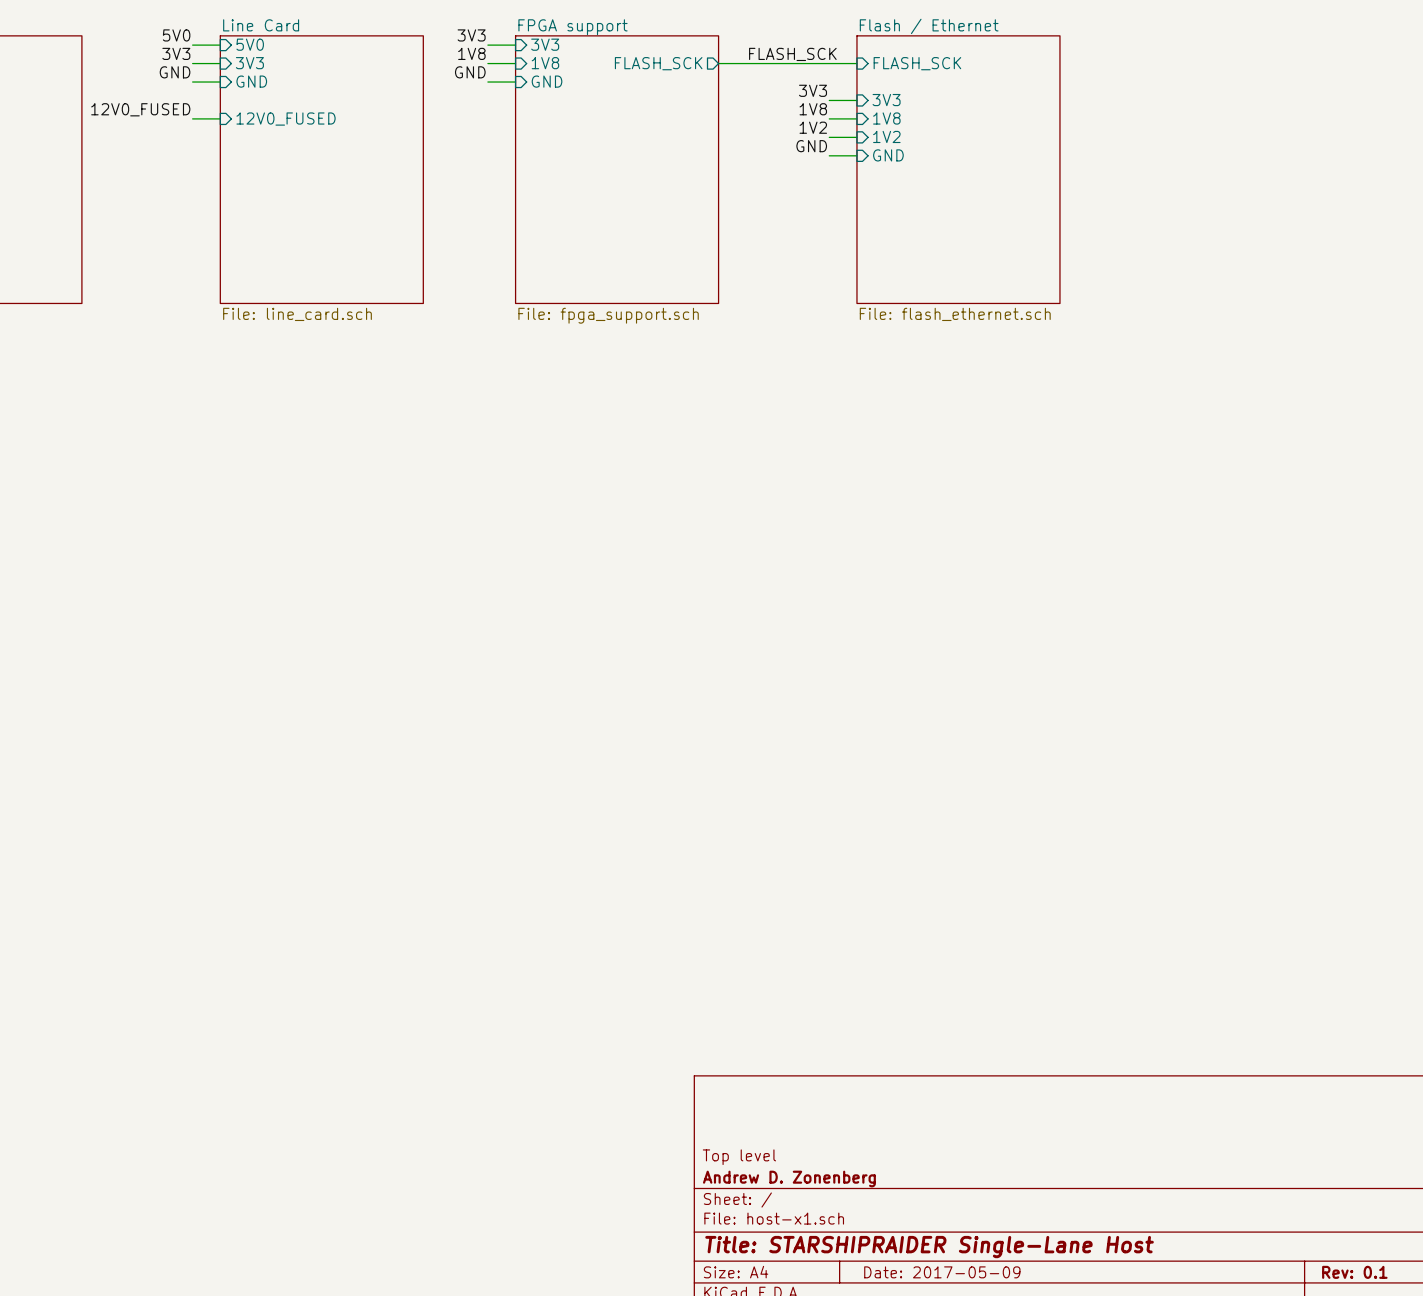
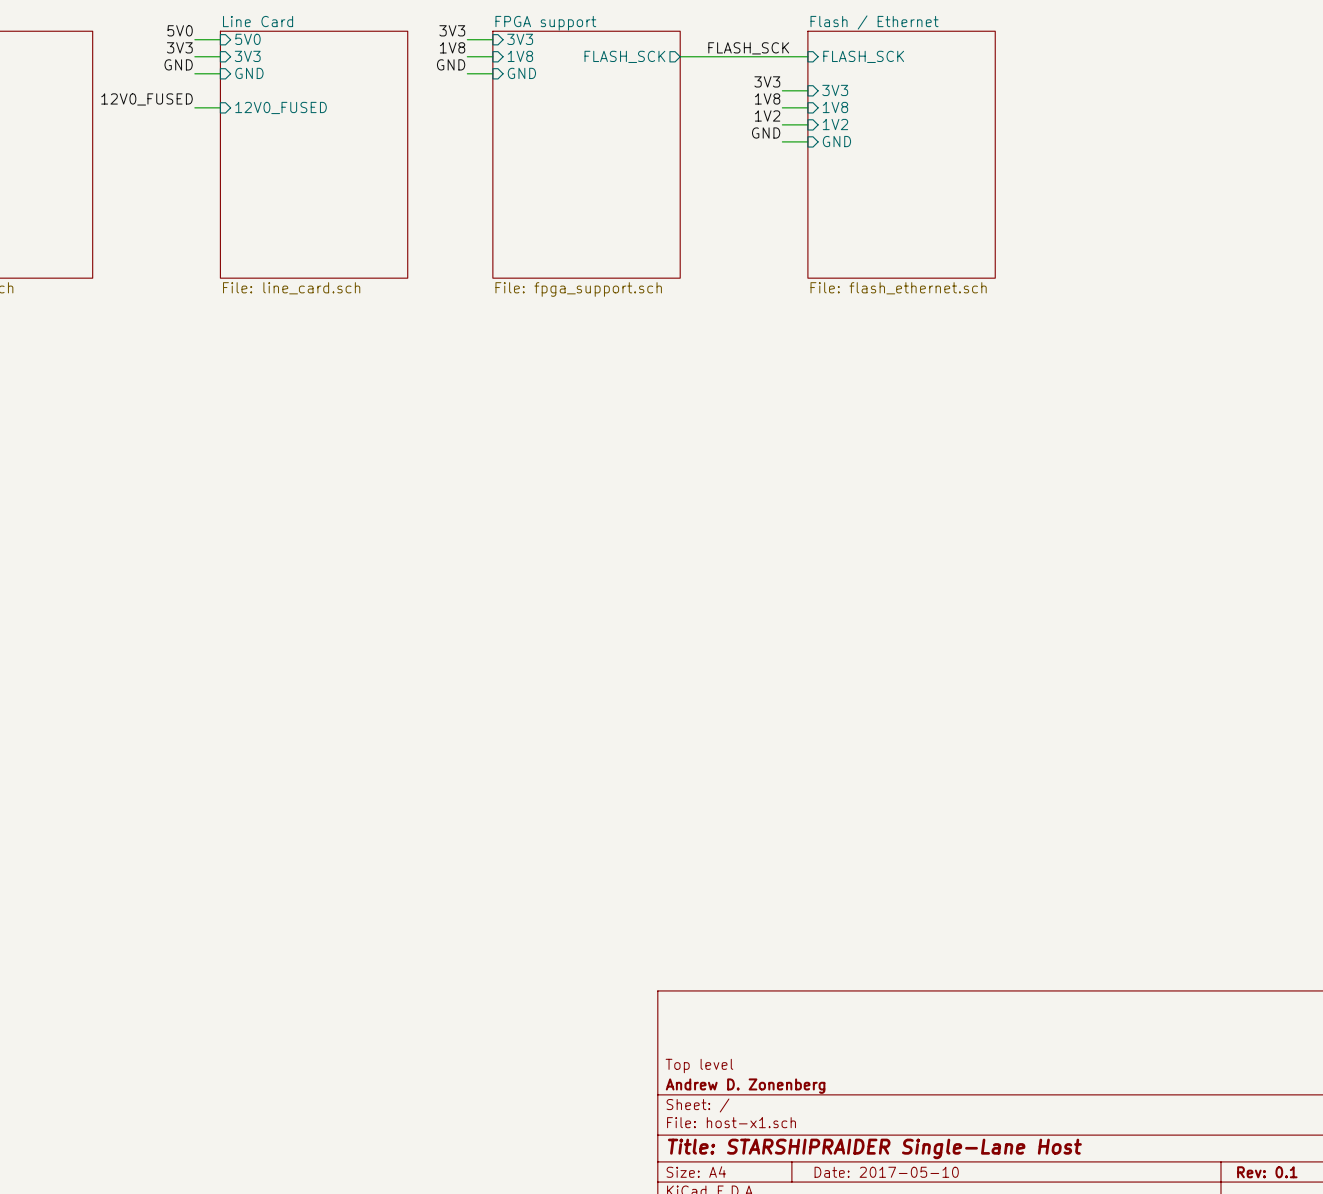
title block: Date: 2017-05-09 (942, 1272) -> Date: 2017-05-10 (886, 1172)

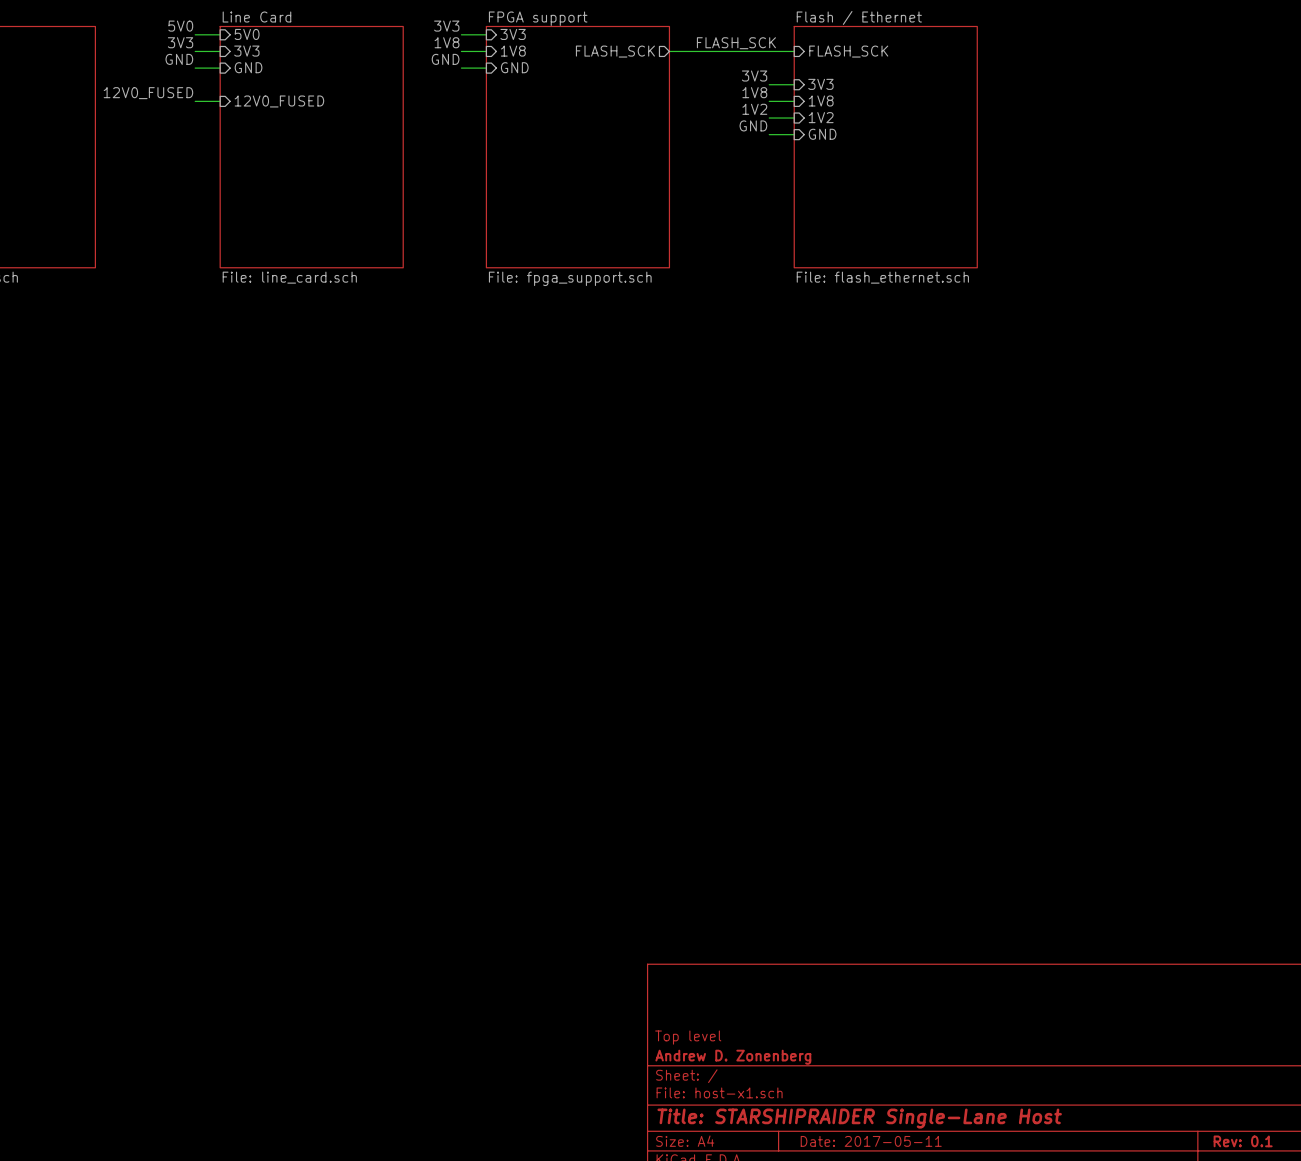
title block: Date: 2017-05-10 (886, 1172) -> Date: 2017-05-11 (871, 1141)

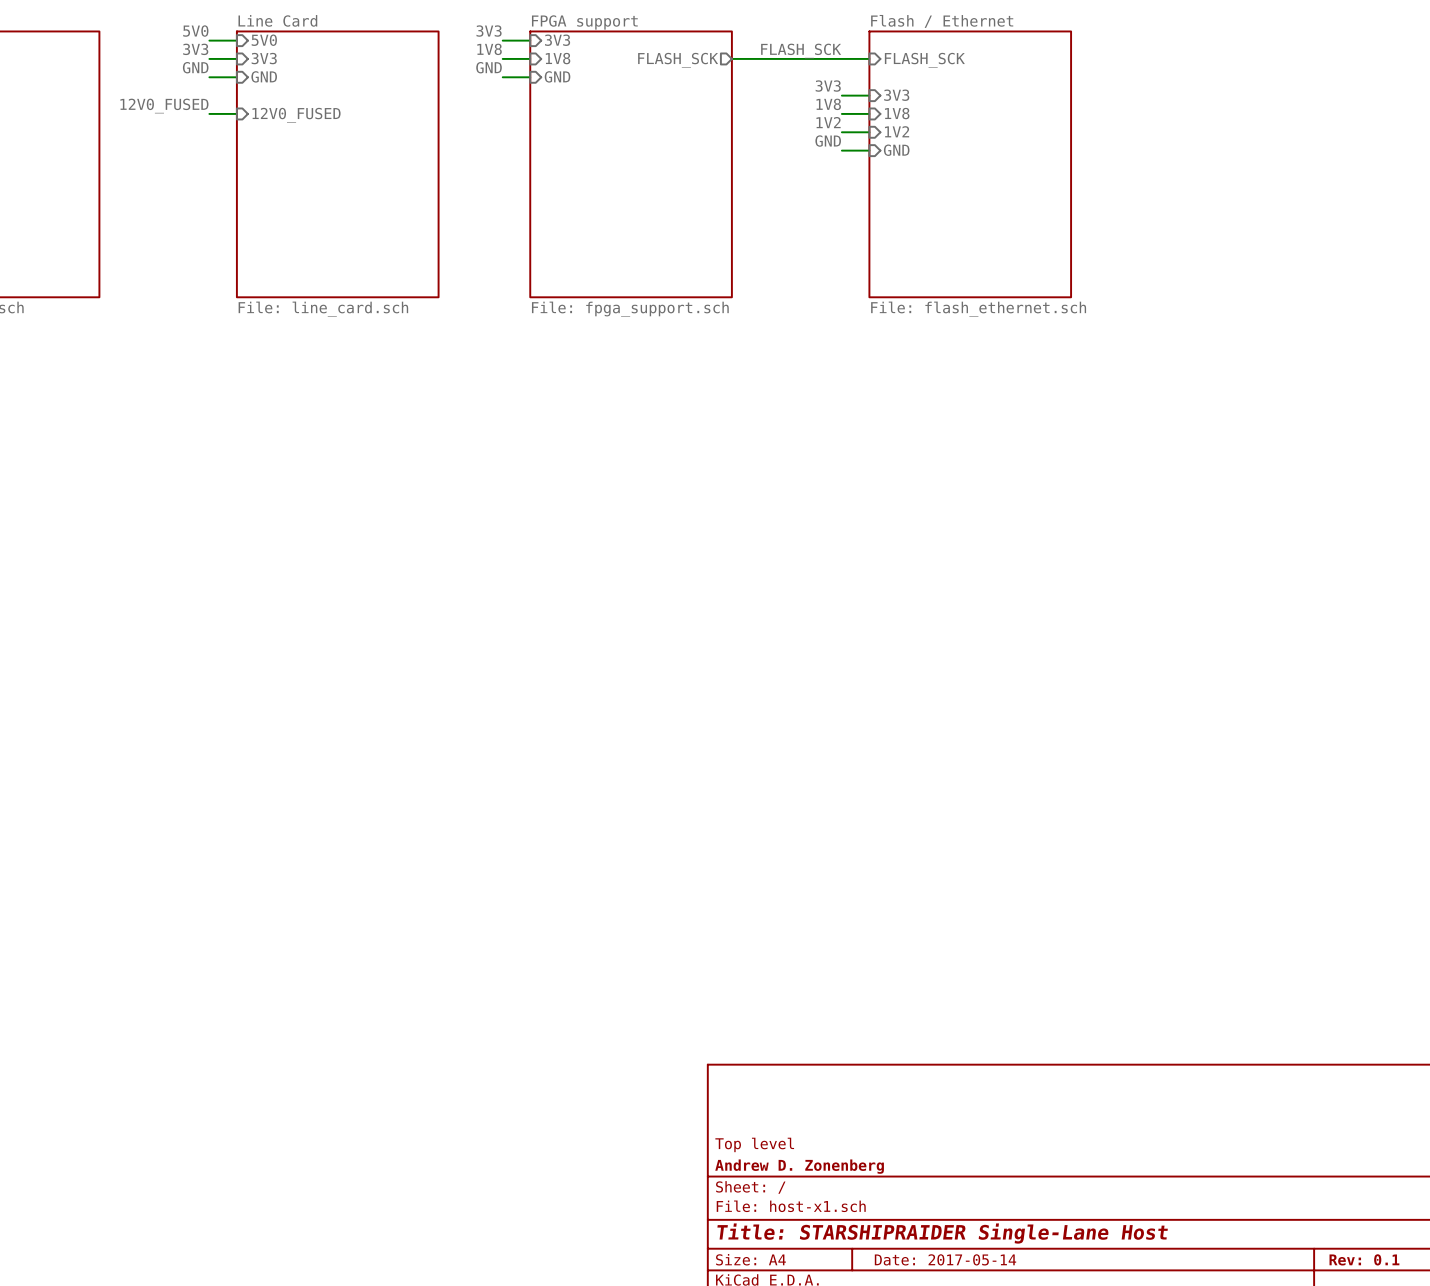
title block: Date: 2017-05-11 (871, 1141) -> Date: 2017-05-14 (945, 1259)

